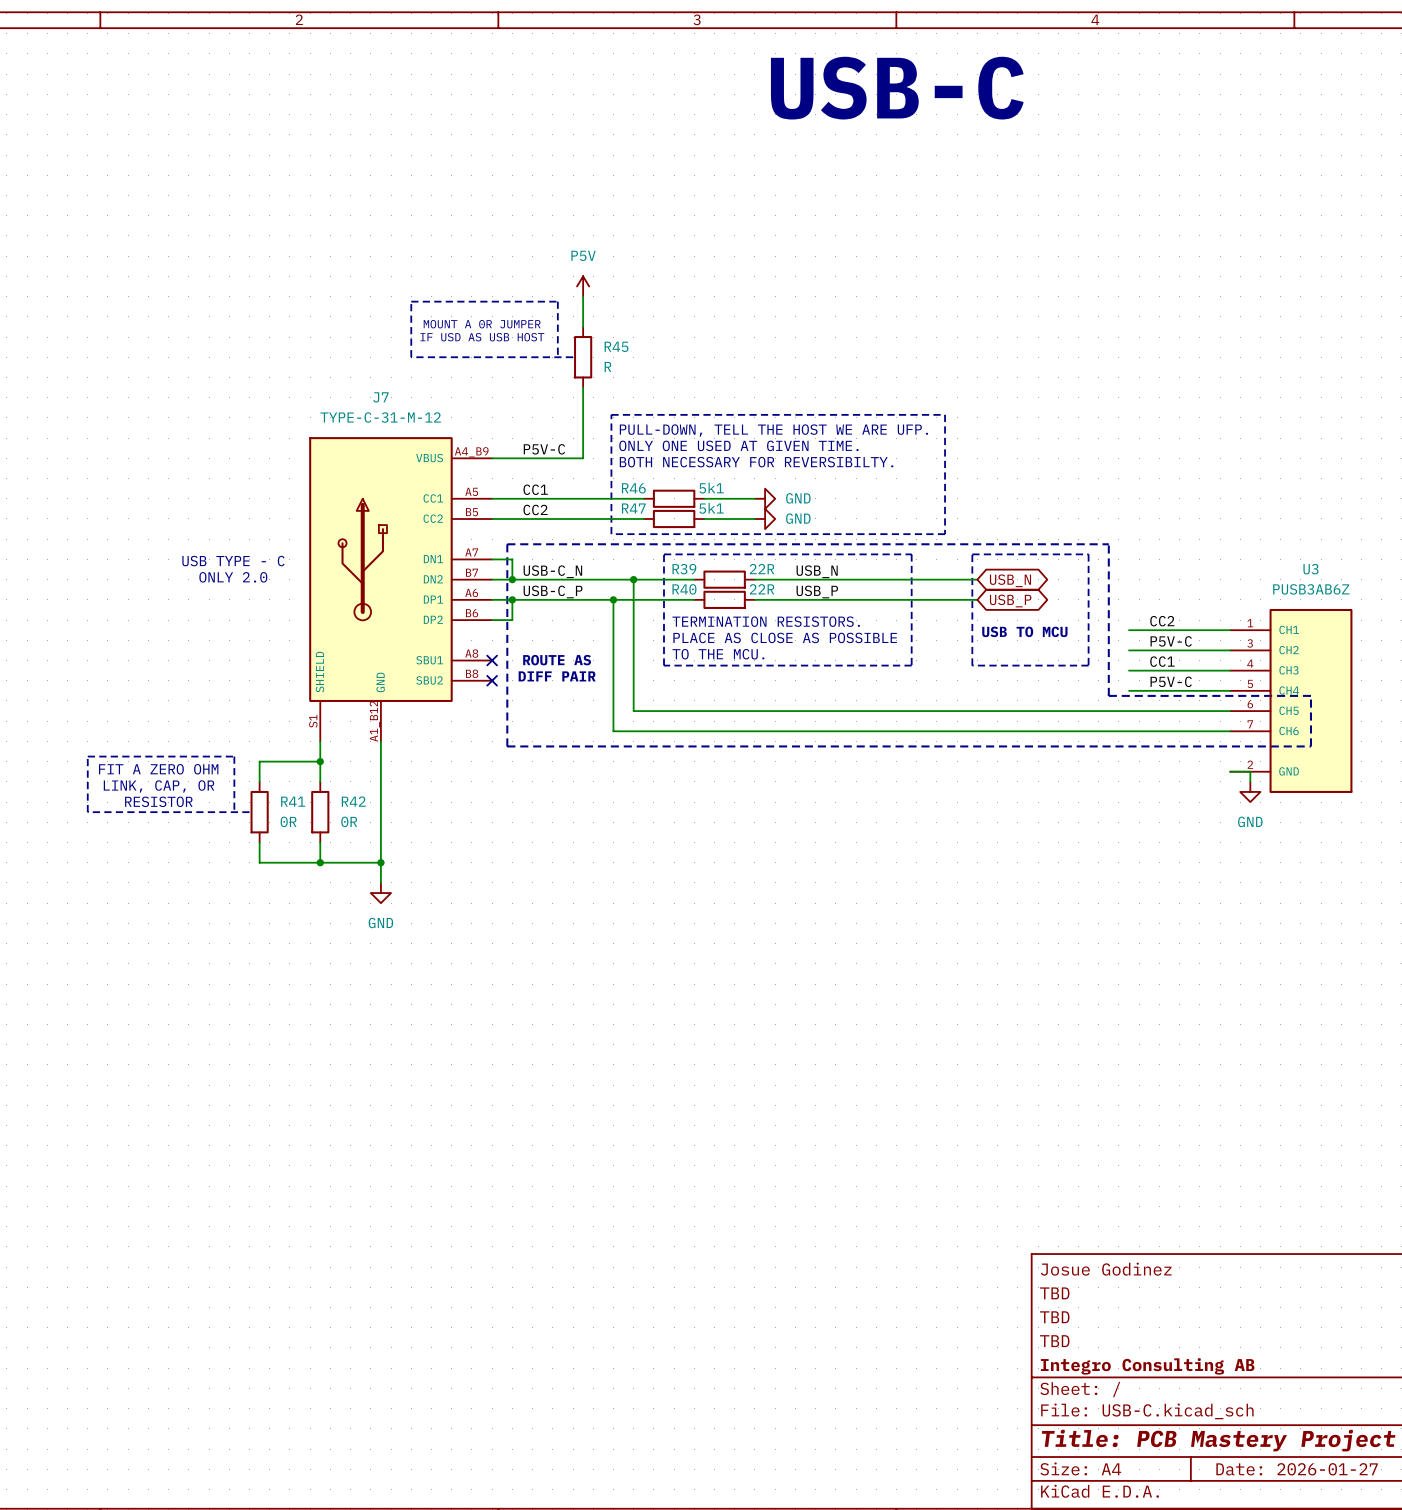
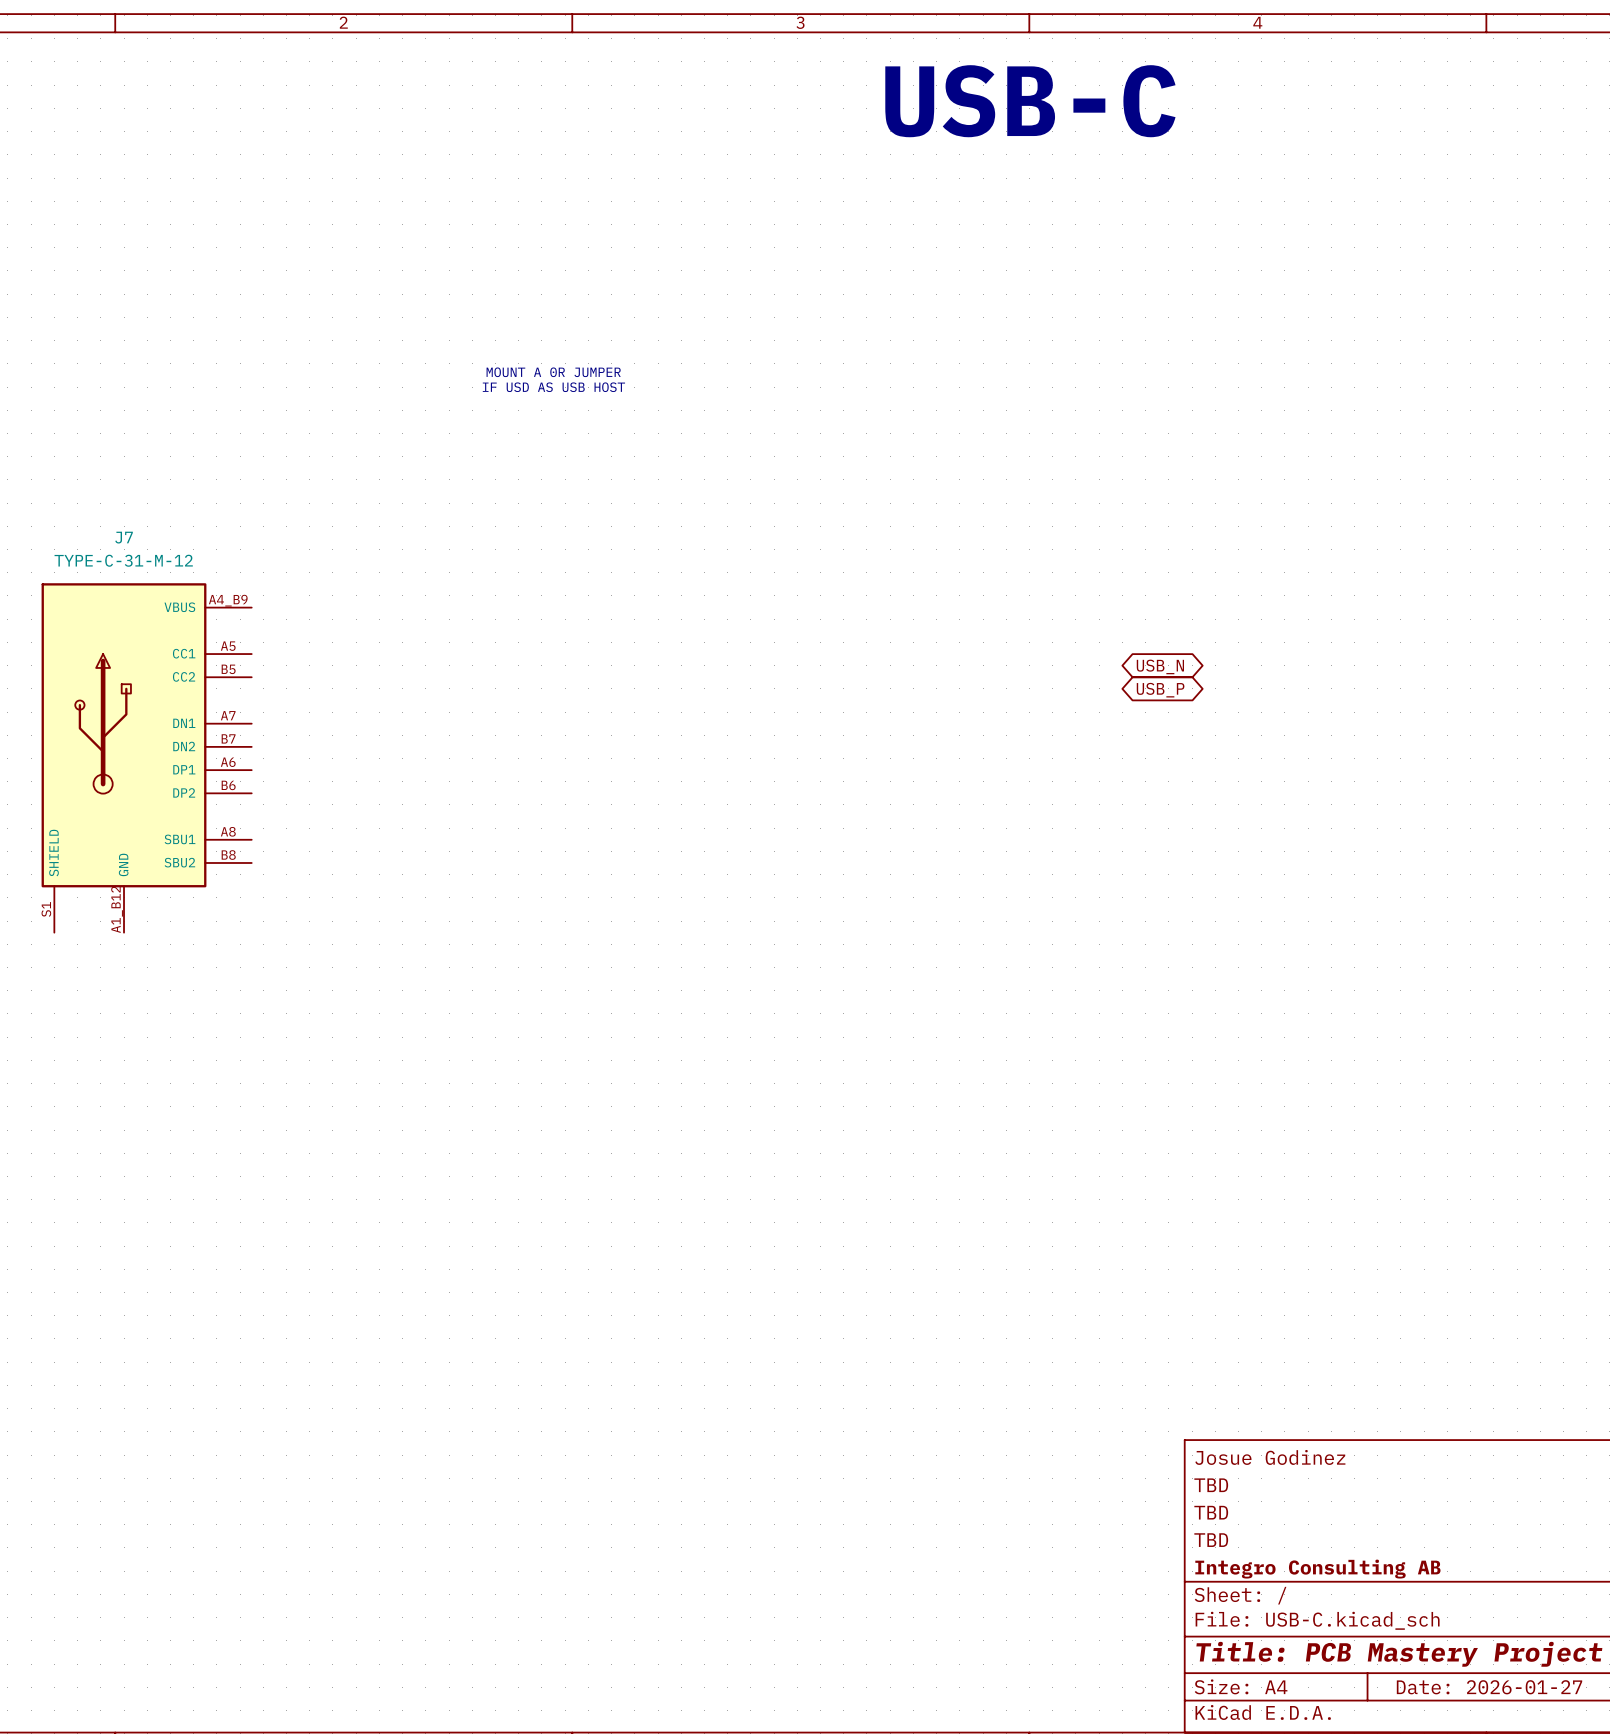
power symbol: P5V (583, 286) -> none
wire: (583, 296) (583, 326) -> none
line: (557, 357) (557, 301) (411, 301) (411, 357) (573, 357) -> none
R45: R (583, 357) -> none
wire: (583, 387) (583, 458) (492, 458) -> none
line: (611, 414) (945, 414) (945, 534) (611, 534) (611, 414) -> none
text: PULL-DOWN, TELL THE HOST WE ARE UFP. (773, 430) -> none
text: ONLY ONE USED AT GIVEN TIME. (738, 445) -> none
label: P5V-C (544, 449) -> none
text: BOTH NECESSARY FOR REVERSIBILTY. (756, 462) -> none
label: CC1 (535, 489) -> none
wire: (492, 498) (643, 498) -> none
R46: 5k1 (674, 498) -> none
wire: (704, 498) (754, 498) -> none
power symbol: GND (765, 498) -> none
label: CC2 (535, 509) -> none
wire: (492, 518) (643, 518) -> none
R47: 5k1 (674, 518) -> none
wire: (704, 518) (754, 518) -> none
power symbol: GND (765, 518) -> none
line: (507, 544) (1108, 544) (1108, 695) (1310, 695) (1310, 746) (507, 746) (507, 544) -> none
line: (663, 554) (911, 554) (911, 665) (663, 665) (663, 554) -> none
line: (972, 554) (1088, 554) (1088, 665) (972, 665) (972, 554) -> none
wire: (492, 559) (512, 559) (512, 579) -> none
text: USB TYPE - C (233, 561) -> none
label: USB-C_N (552, 571) -> none
label: USB_N (817, 571) -> none
text: ONLY 2.0 (233, 577) -> none
wire: (492, 579) (694, 579) -> none
junction: (512, 579) -> none
wire: (633, 579) (633, 711) (1230, 711) -> none
junction: (633, 579) -> none
R39: 22R (724, 579) -> none
wire: (754, 579) (977, 579) -> none
J7 position: (400, 589) -> (146, 757)
label: USB-C_P (553, 591) -> none
label: USB_P (817, 591) -> none
wire: (492, 599) (694, 599) -> none
wire: (512, 599) (512, 620) (492, 620) -> none
junction: (512, 599) -> none
wire: (613, 599) (613, 731) (1230, 731) -> none
junction: (613, 599) -> none
R40: 22R (724, 599) -> none
wire: (754, 599) (977, 599) -> none
text: TERMINATION RESISTORS. (766, 621) -> none
label: CC2 (1162, 621) -> none
wire: (1129, 630) (1230, 630) -> none
text: USB TO MCU (1024, 631) -> none
text: PLACE AS CLOSE AS POSSIBLE (785, 637) -> none
label: P5V-C (1171, 641) -> none
wire: (1129, 650) (1230, 650) -> none
text: TO THE MCU. (718, 654) -> none
no-connect mark: (492, 660) -> none
text: ROUTE AS (557, 660) -> none
label: CC1 (1162, 661) -> none
wire: (1129, 670) (1230, 670) -> none
text: DIFF PAIR (557, 676) -> none
no-connect mark: (492, 680) -> none
label: P5V-C (1171, 681) -> none
wire: (1129, 690) (1230, 690) -> none
U3: PUSB3AB6Z (1291, 700) -> none
wire: (320, 741) (320, 781) -> none
wire: (380, 741) (380, 882) -> none
wire: (320, 761) (259, 761) (259, 781) -> none
junction: (320, 761) -> none
text: FIT A ZERO OHM (158, 769) -> none
wire: (1230, 771) (1250, 771) (1250, 781) -> none
text: LINK, CAP, OR (159, 786) -> none
power symbol: GND (1250, 791) -> none
text: RESISTOR (158, 801) -> none
line: (234, 812) (234, 756) (87, 756) (87, 812) (249, 812) -> none
R41: 0R (259, 812) -> none
R42: 0R (320, 812) -> none
wire: (259, 842) (259, 862) (380, 862) -> none
wire: (320, 842) (320, 862) -> none
junction: (320, 862) -> none
junction: (380, 862) -> none
power symbol: GND (380, 893) -> none

